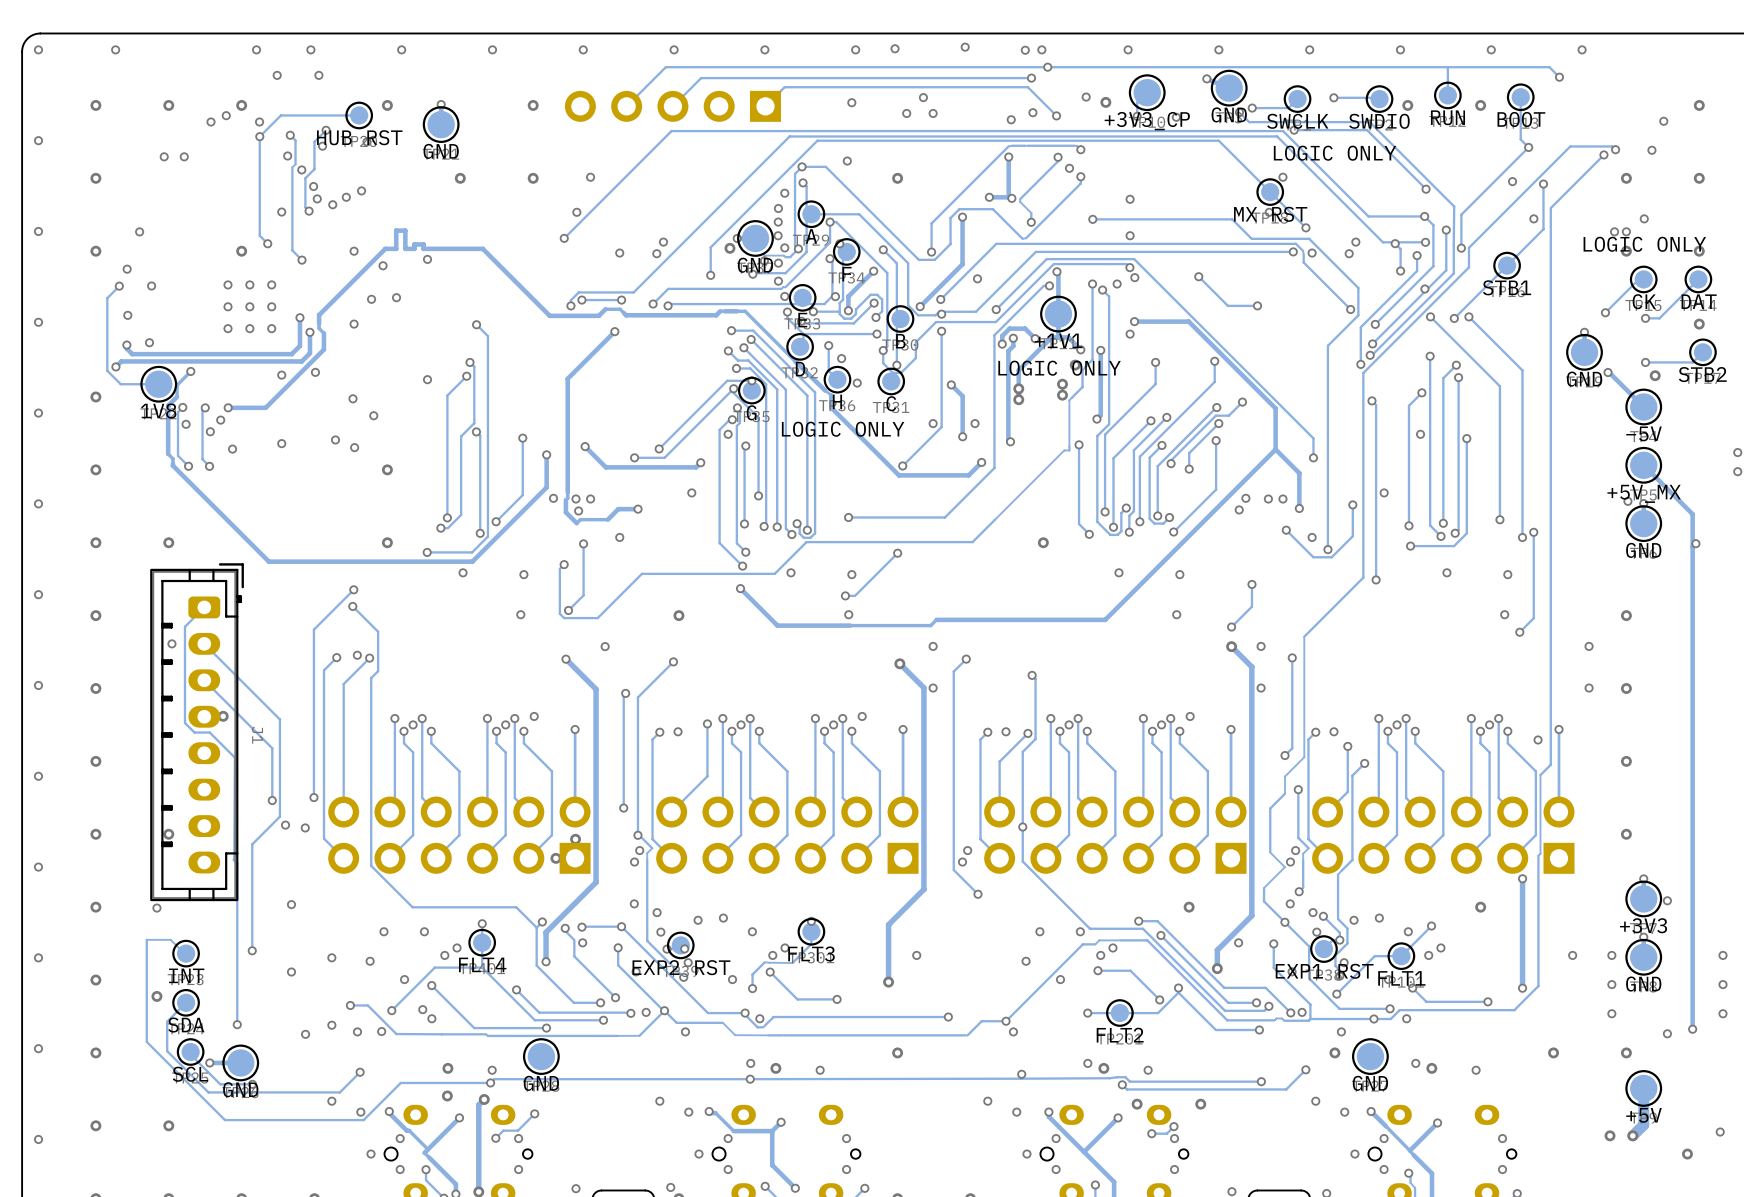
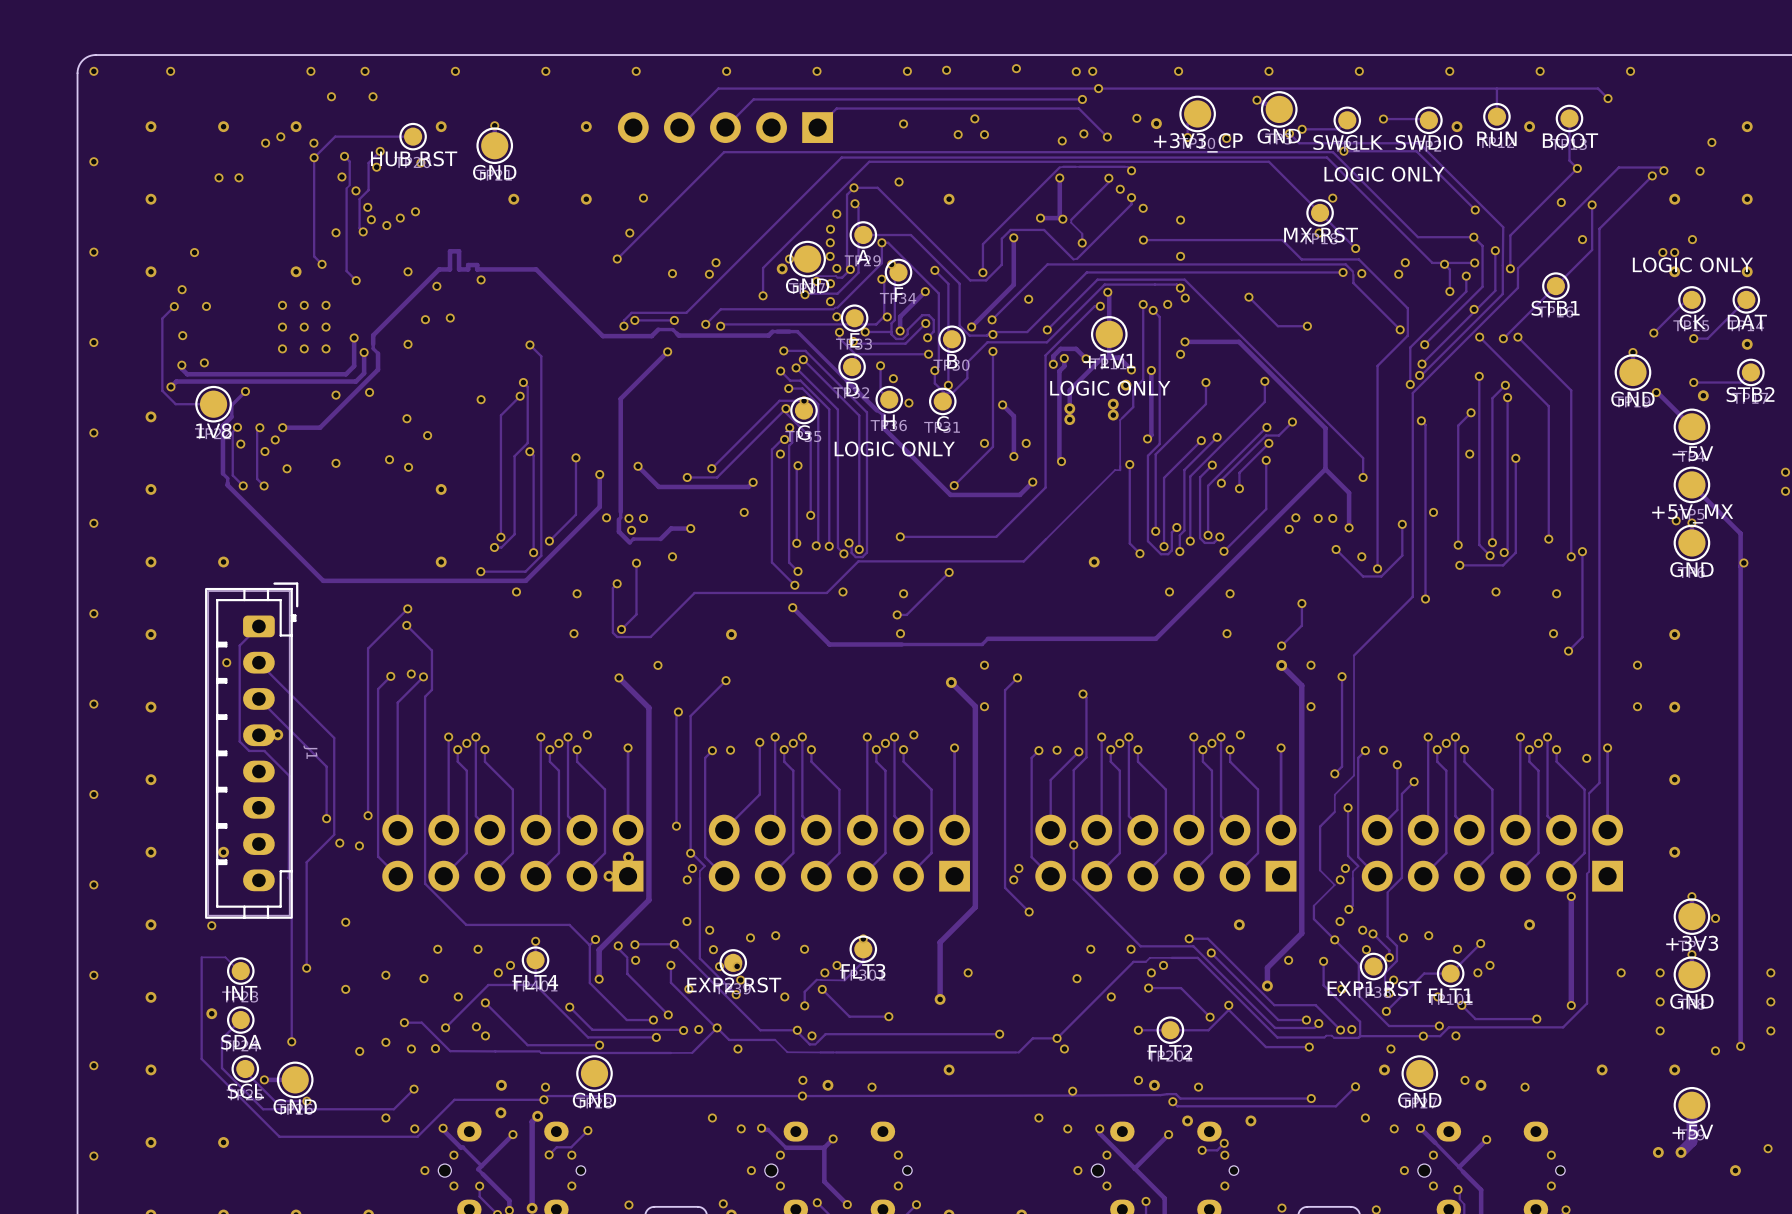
via: none -> (1143, 208)

